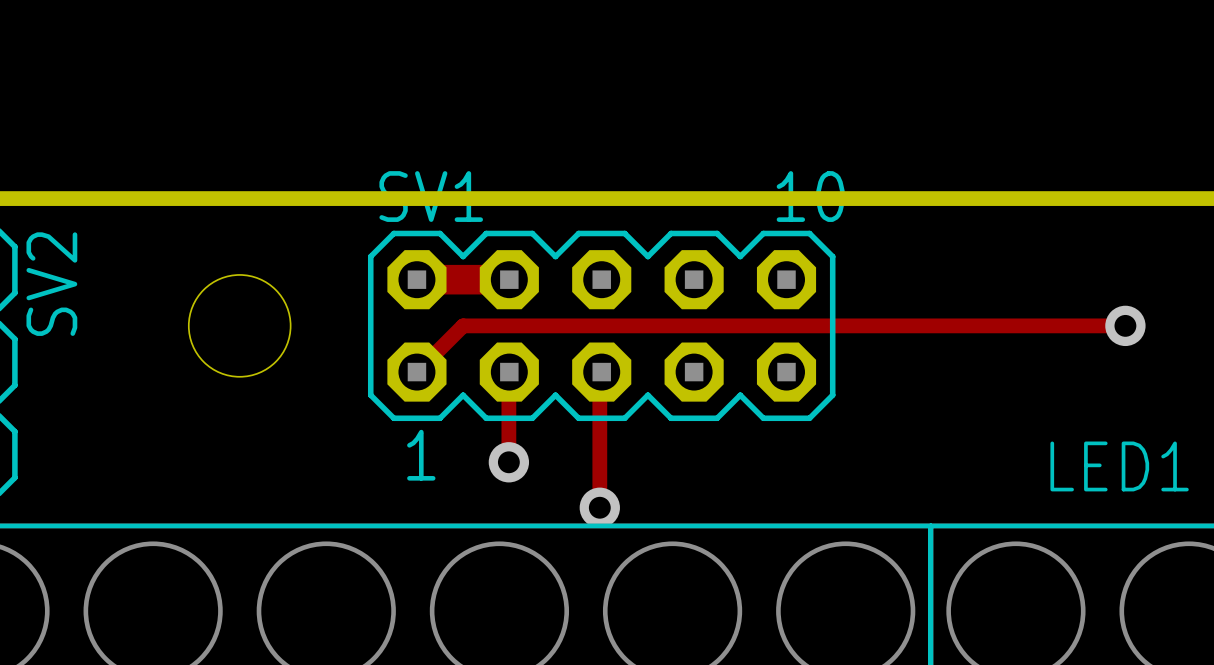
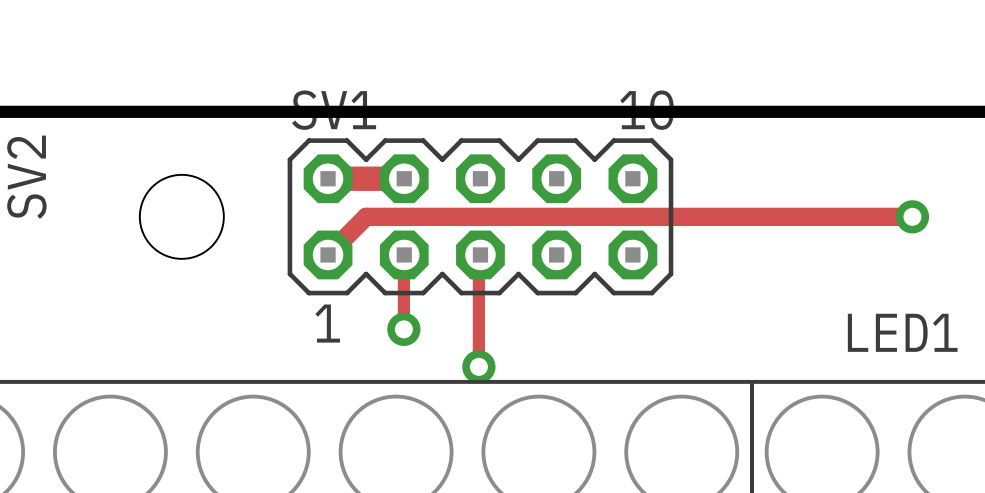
track width: thin (1125, 325) (463, 325) (416, 372) -> thick (912, 216) (366, 216) (328, 254)

